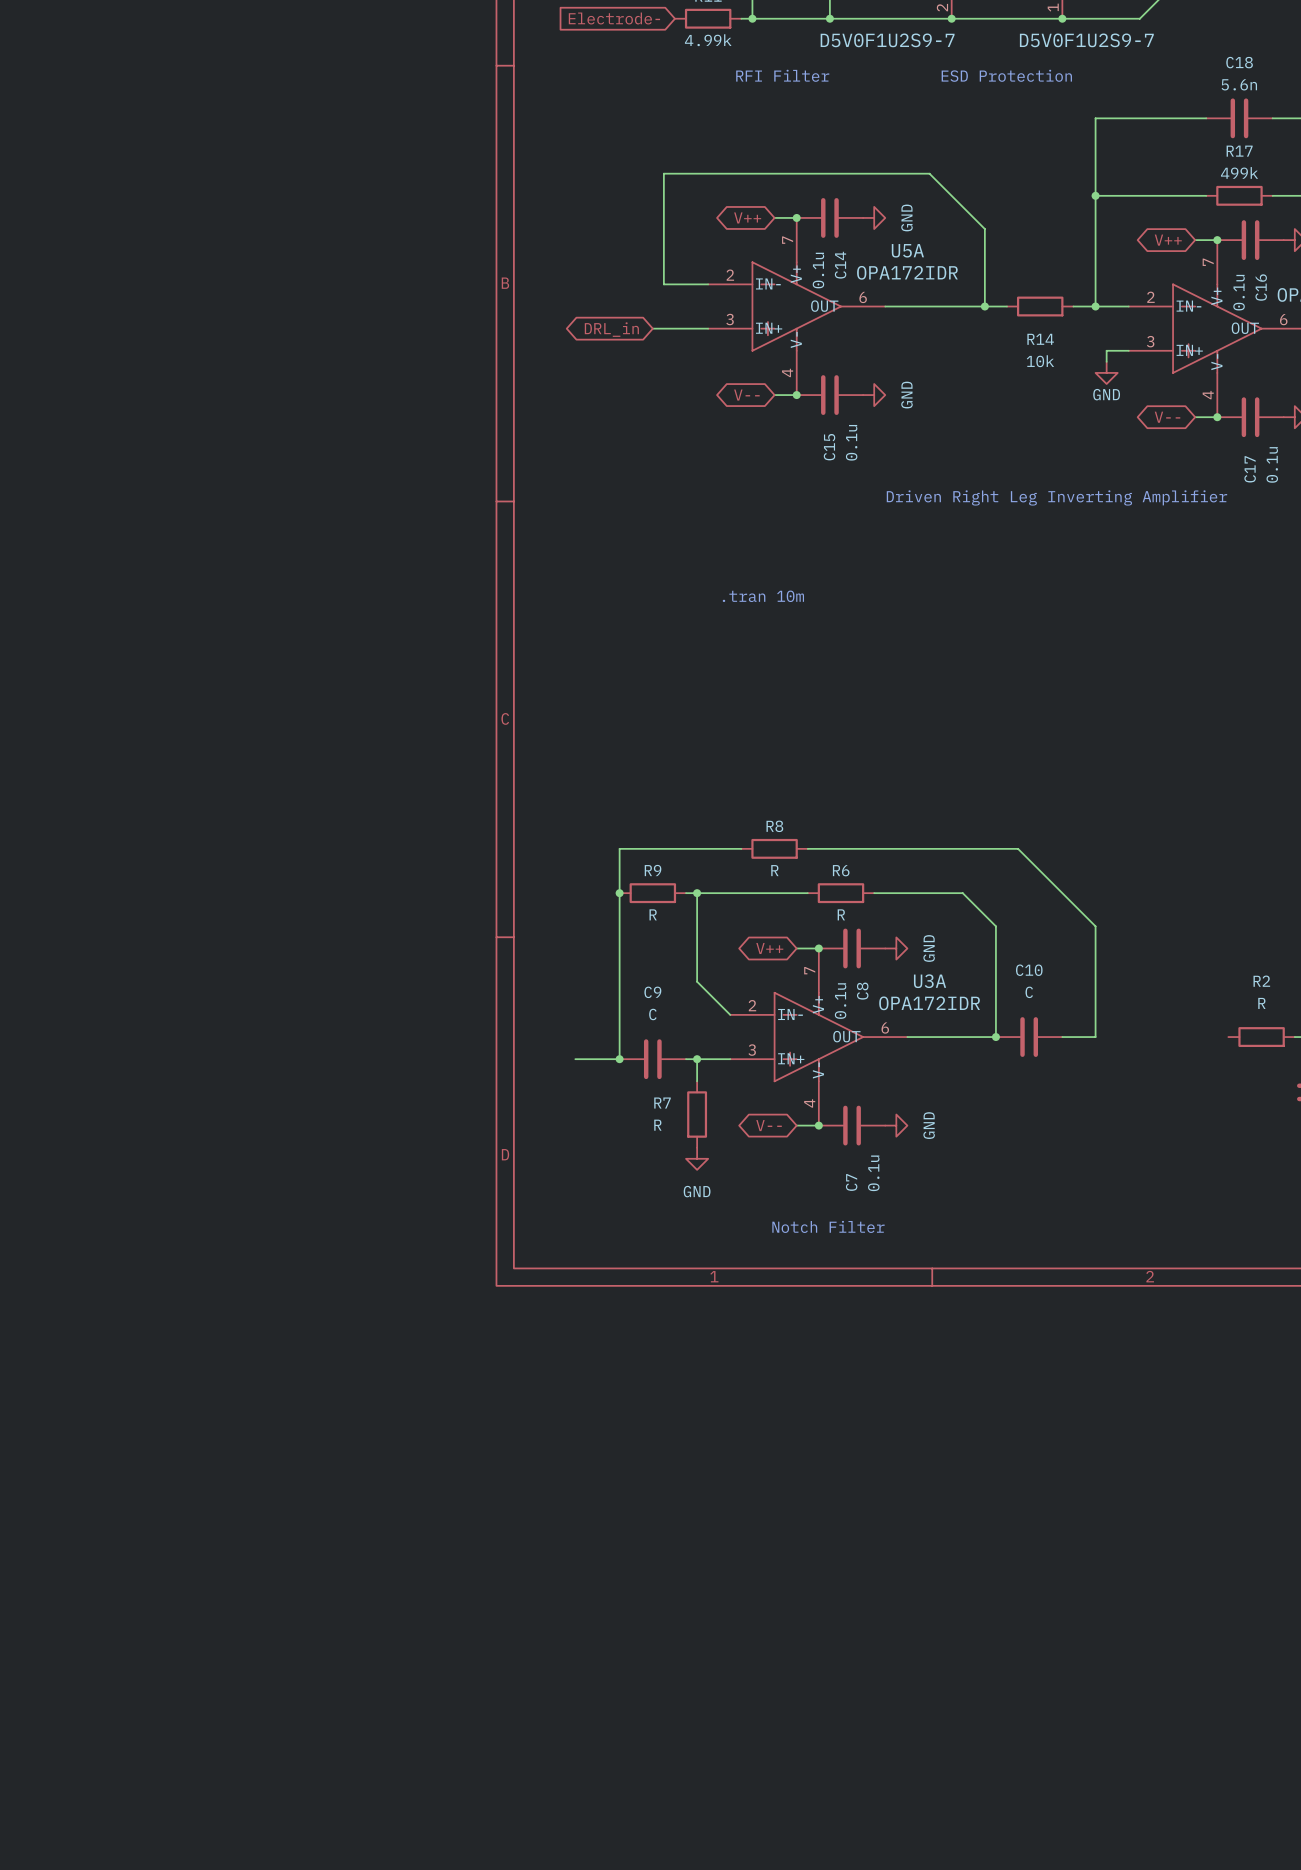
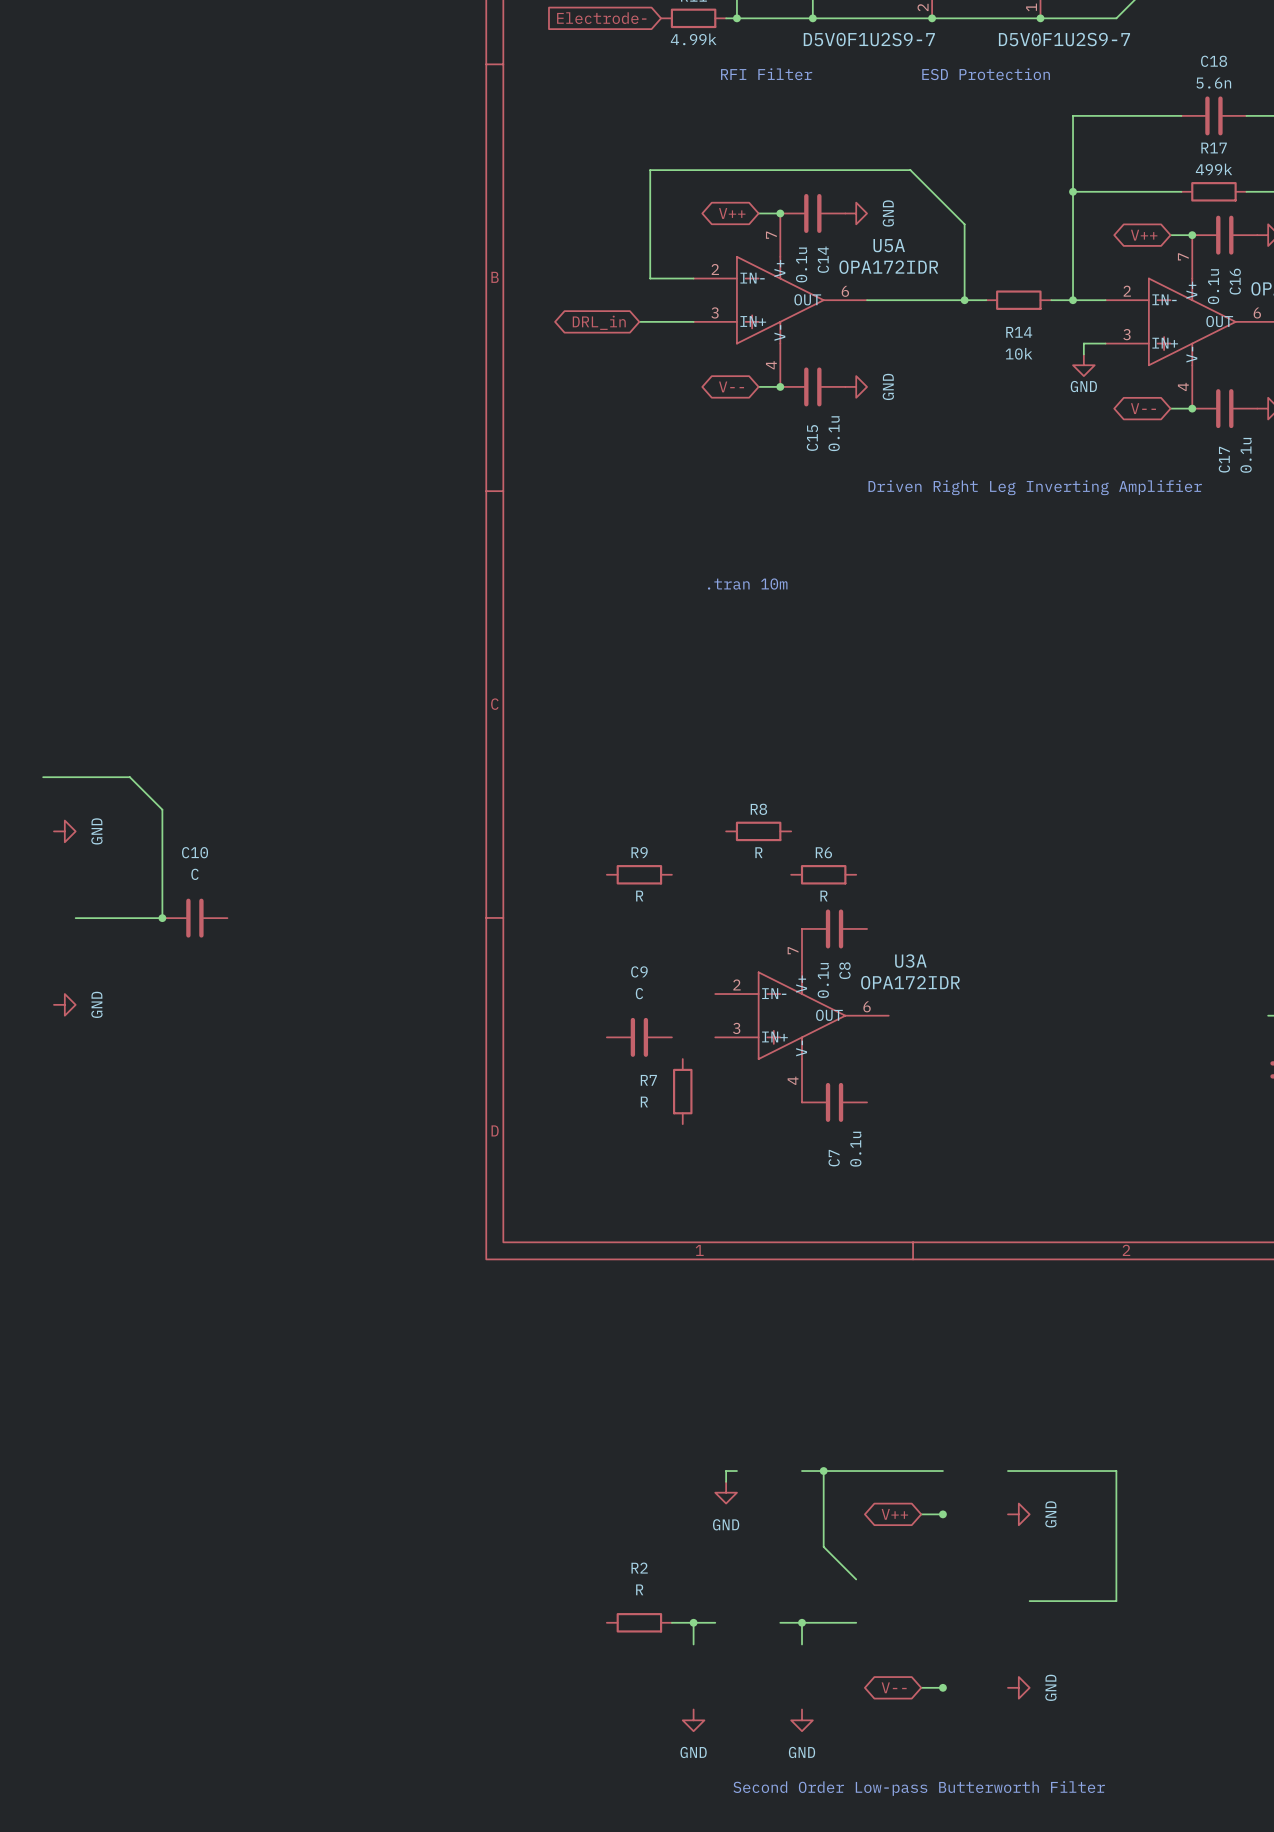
wire: none -> (43, 777) (129, 777) (162, 809) (162, 918) (75, 918)
power symbol: none -> GND (64, 831)
wire: (741, 848) (619, 848) (619, 1059) (575, 1059) -> none
wire: (807, 848) (1018, 848) (1095, 926) (1095, 1037) (1062, 1037) -> none
junction: (619, 893) -> none
wire: (686, 893) (807, 893) -> none
wire: (697, 893) (697, 981) (730, 1014) -> none
junction: (697, 893) -> none
wire: (874, 893) (962, 893) (995, 926) (995, 1037) (907, 1037) -> none
junction: none -> (162, 918)
global label: V++ (769, 948) -> none
wire: (796, 948) (818, 948) -> none
junction: (818, 948) -> none
power symbol: GND (896, 948) -> none
power symbol: none -> GND (64, 1004)
junction: (995, 1037) -> none
C10 position: (1029, 1037) -> (194, 918)
R2 position: (1261, 1037) -> (639, 1622)
junction: (619, 1059) -> none
wire: (686, 1059) (730, 1059) -> none
wire: (697, 1059) (697, 1081) -> none
junction: (697, 1059) -> none
global label: V-- (769, 1125) -> none
wire: (796, 1125) (818, 1125) -> none
junction: (818, 1125) -> none
power symbol: GND (896, 1125) -> none
power symbol: GND (697, 1158) -> none
text: Notch Filter (828, 1226) -> none
wire: none -> (736, 1471) (726, 1471) (726, 1481)
wire: none -> (802, 1471) (942, 1471)
wire: none -> (823, 1471) (823, 1546) (856, 1579)
junction: none -> (823, 1471)
wire: none -> (1007, 1471) (1116, 1471) (1116, 1601) (1029, 1601)
power symbol: none -> GND (726, 1492)
global label: none -> V++ (894, 1514)
wire: none -> (921, 1514) (942, 1514)
junction: none -> (942, 1514)
power symbol: none -> GND (1018, 1514)
wire: none -> (671, 1622) (715, 1622)
wire: none -> (693, 1622) (693, 1644)
junction: none -> (693, 1622)
wire: none -> (780, 1622) (856, 1622)
wire: none -> (802, 1622) (802, 1644)
junction: none -> (802, 1622)
global label: none -> V-- (894, 1687)
wire: none -> (921, 1687) (942, 1687)
junction: none -> (942, 1687)
power symbol: none -> GND (1018, 1687)
power symbol: none -> GND (693, 1720)
power symbol: none -> GND (802, 1720)
text: none -> Second Order Low-pass Butterworth Filter (919, 1788)

